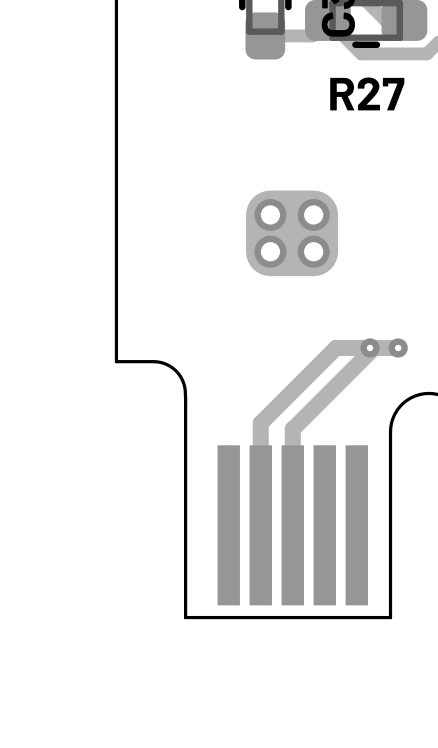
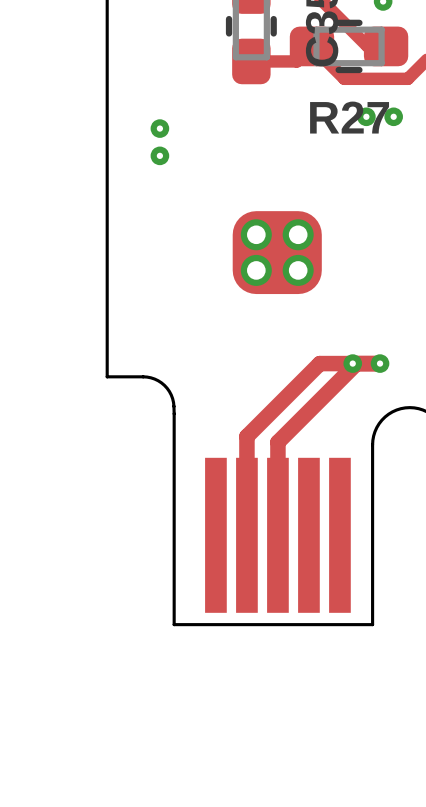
via: none -> (366, 116)
via: none -> (393, 116)
via: none -> (159, 128)
via: none -> (159, 155)

